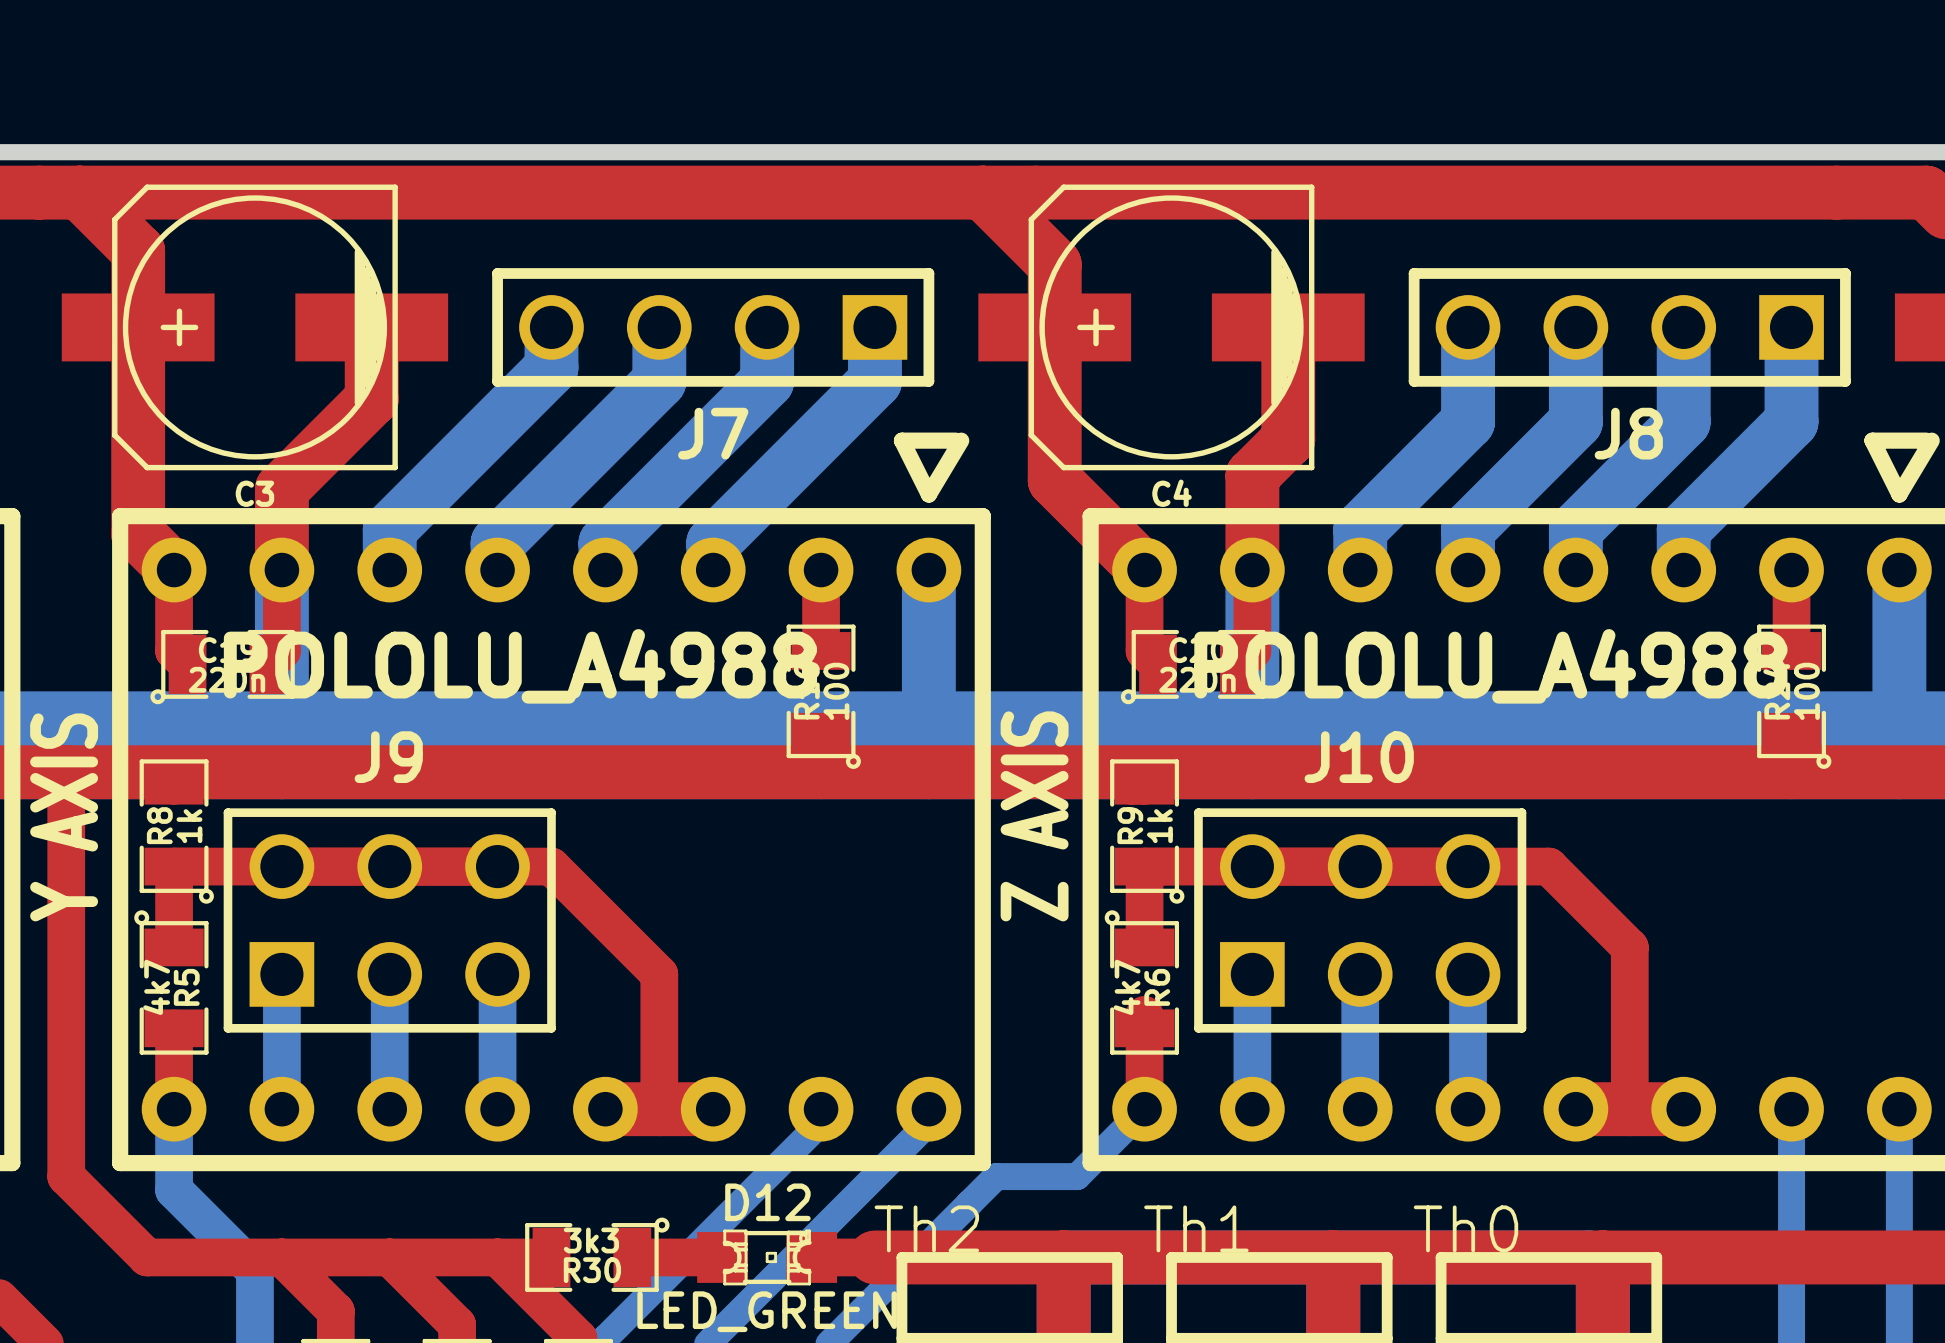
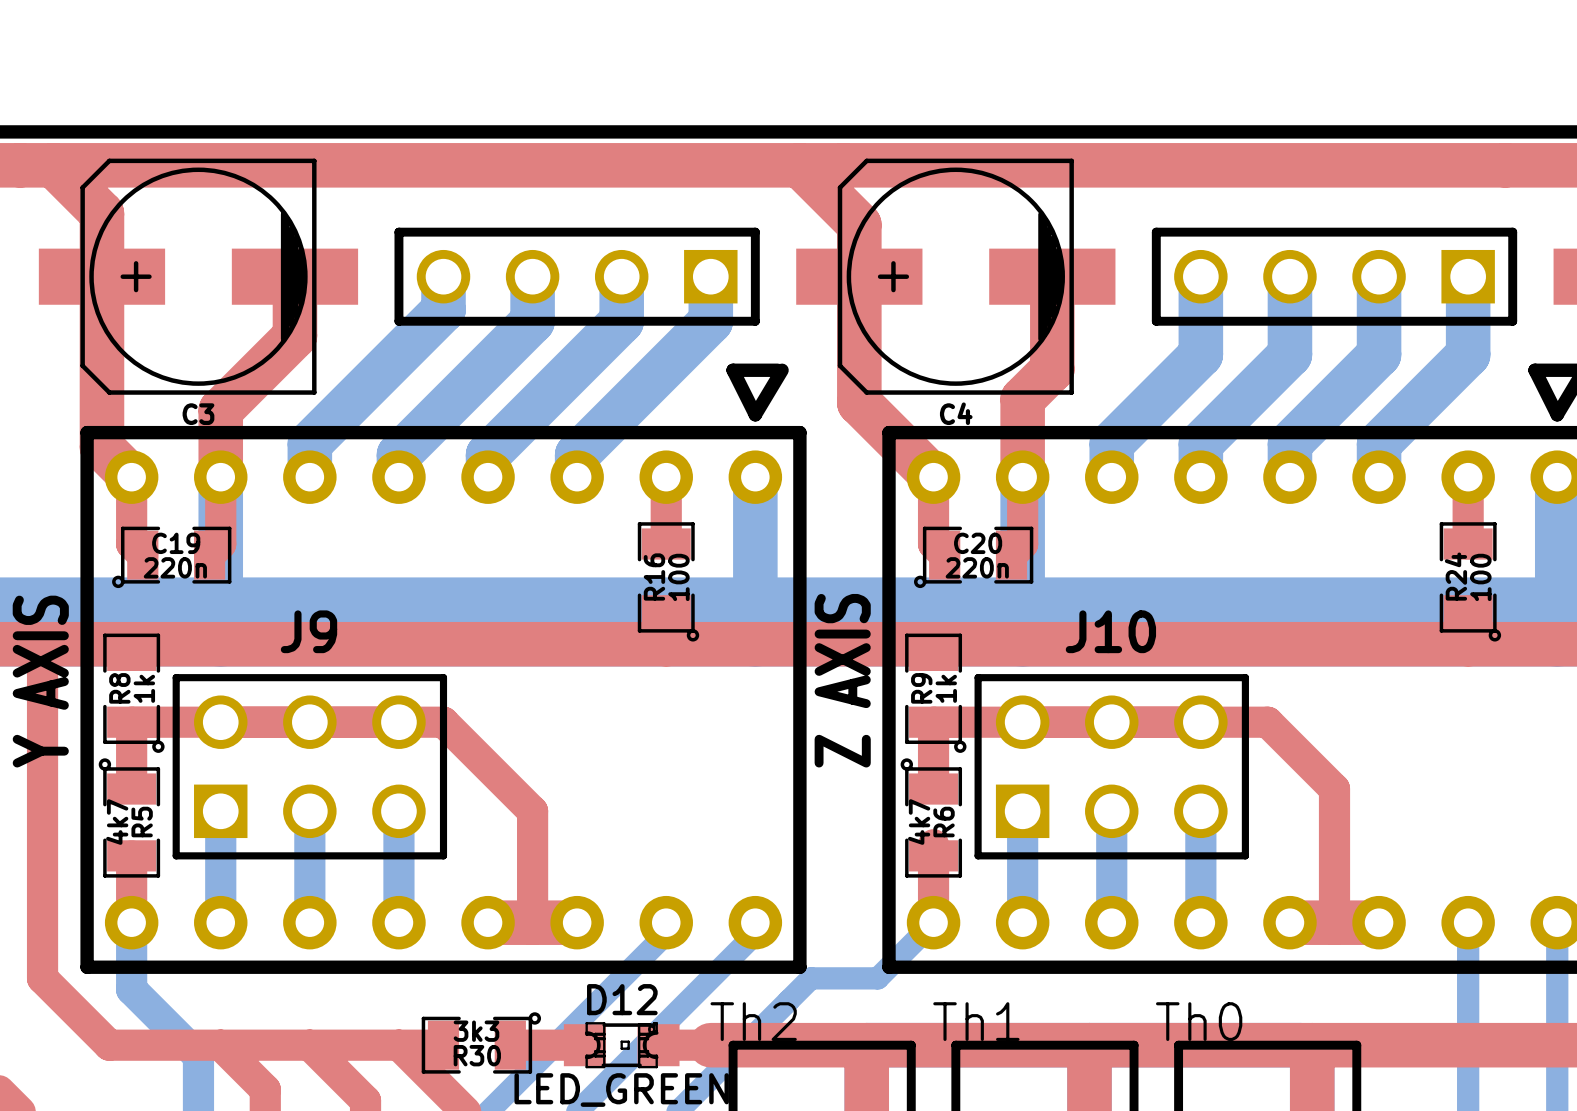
J7 name: J7 (713, 433) -> none
J8 name: J8 (1628, 433) -> none
part value: POLOLU_A4988 (520, 666) -> none
part value: POLOLU_A4988 (1490, 666) -> none

